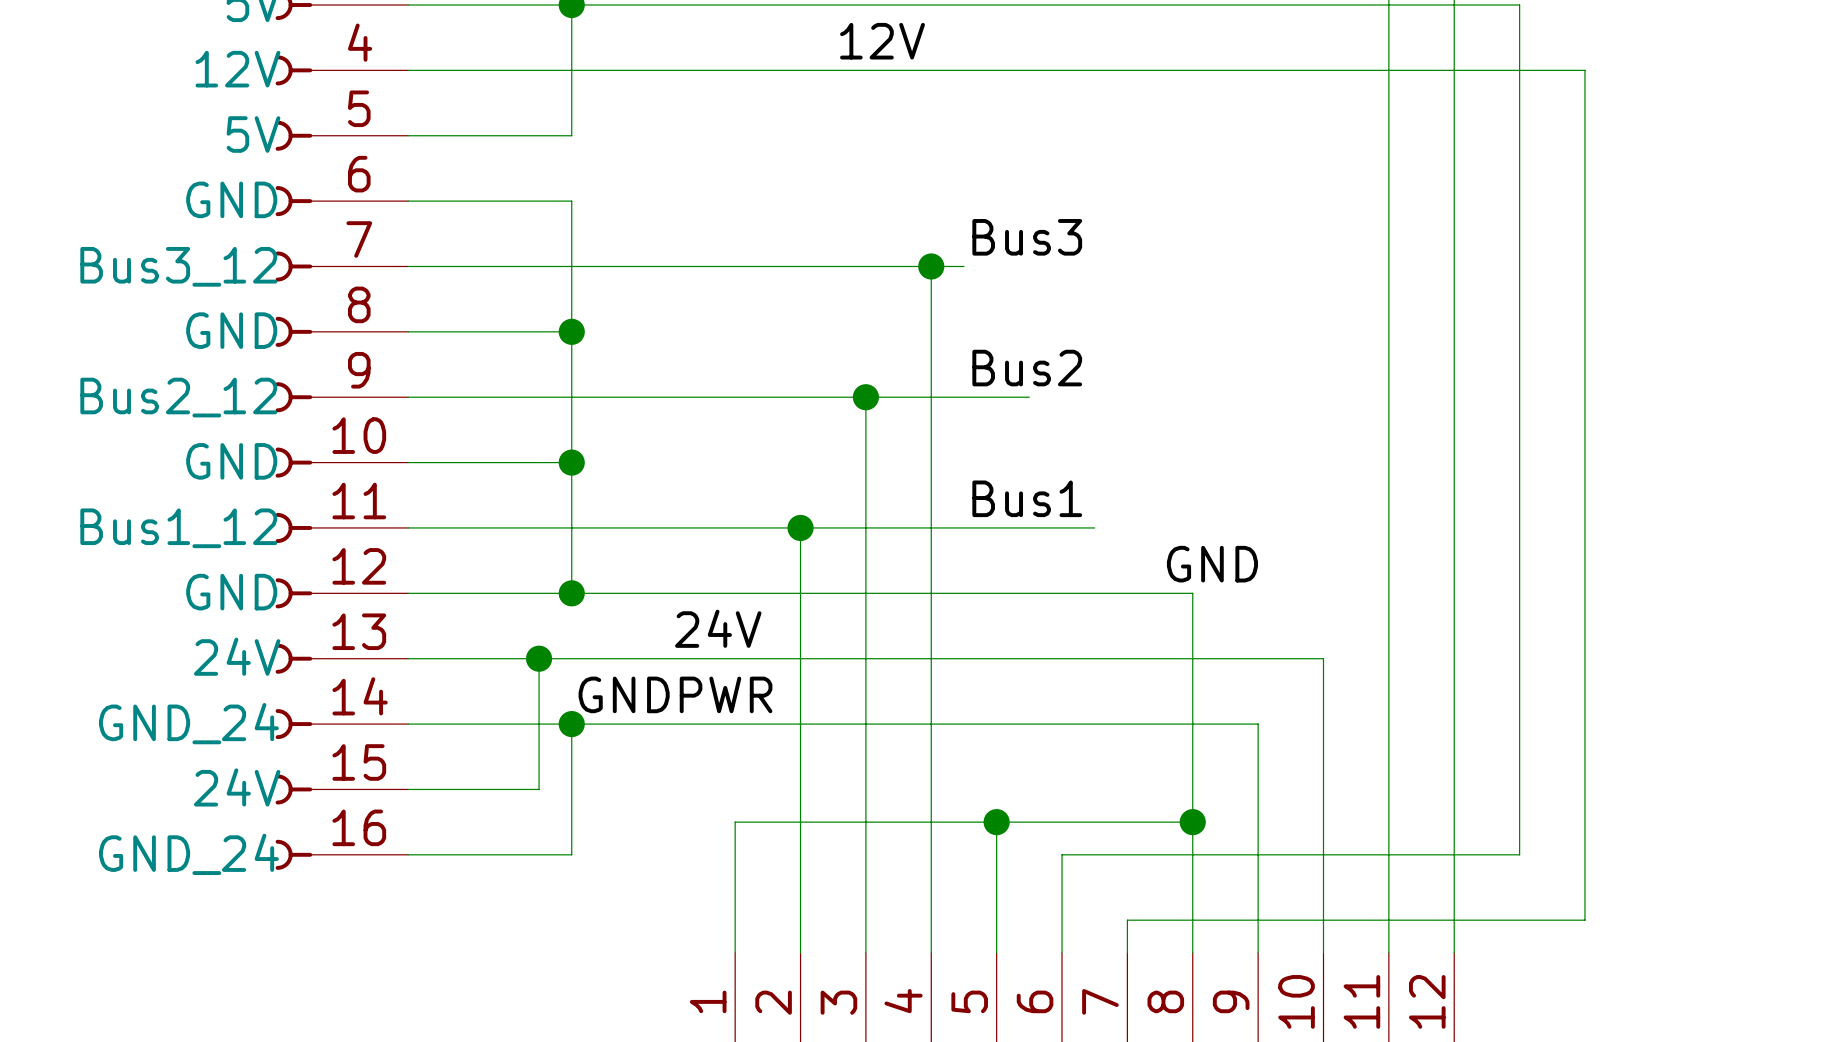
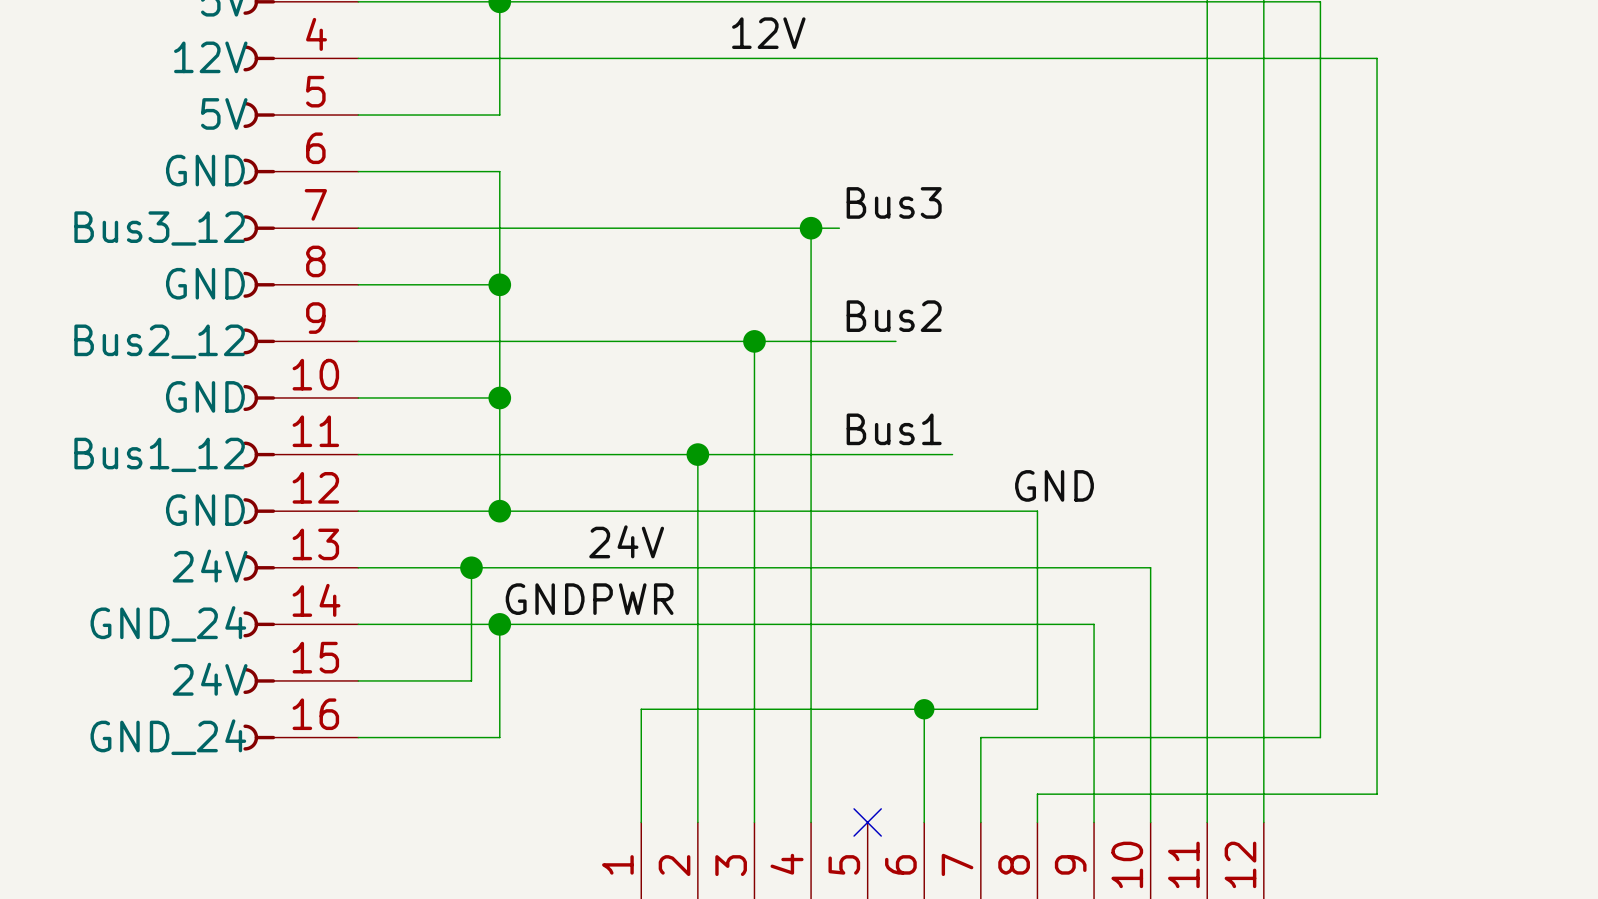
wire: (996, 822) (996, 952) -> none
junction: (996, 822) -> none
junction: none -> (924, 709)
wire: (1192, 822) (1192, 920) (1127, 920) -> (980, 737) (980, 794)
junction: (1192, 822) -> none
wire: (1062, 854) (1127, 854) -> (924, 737) (924, 709)
no-connect mark: none -> (867, 822)

